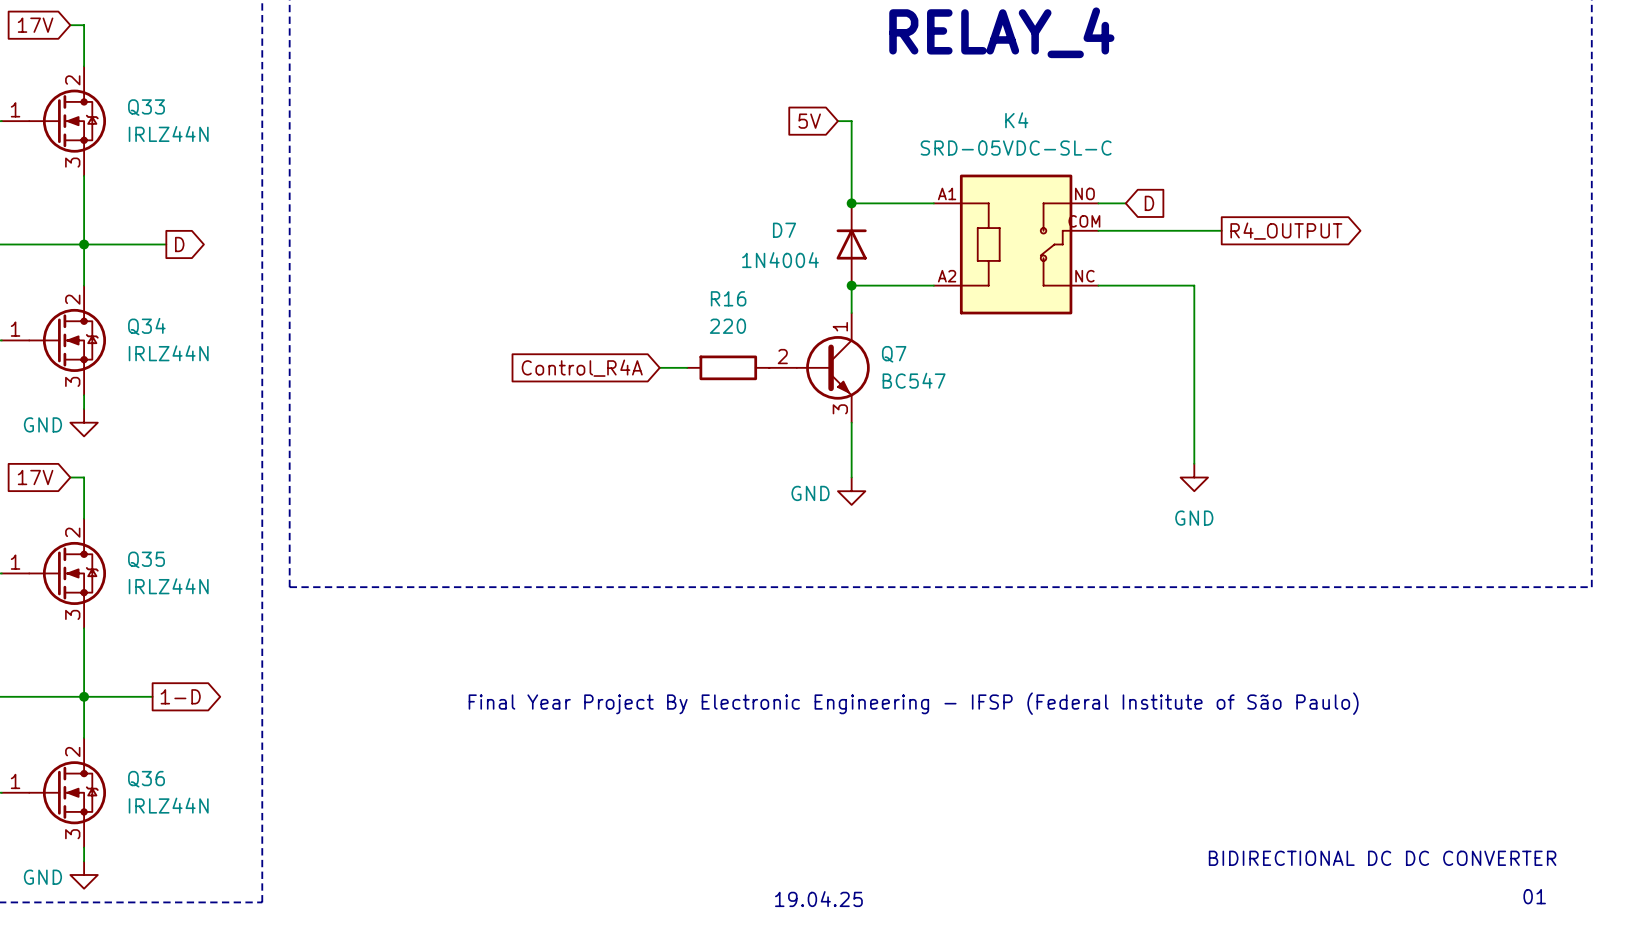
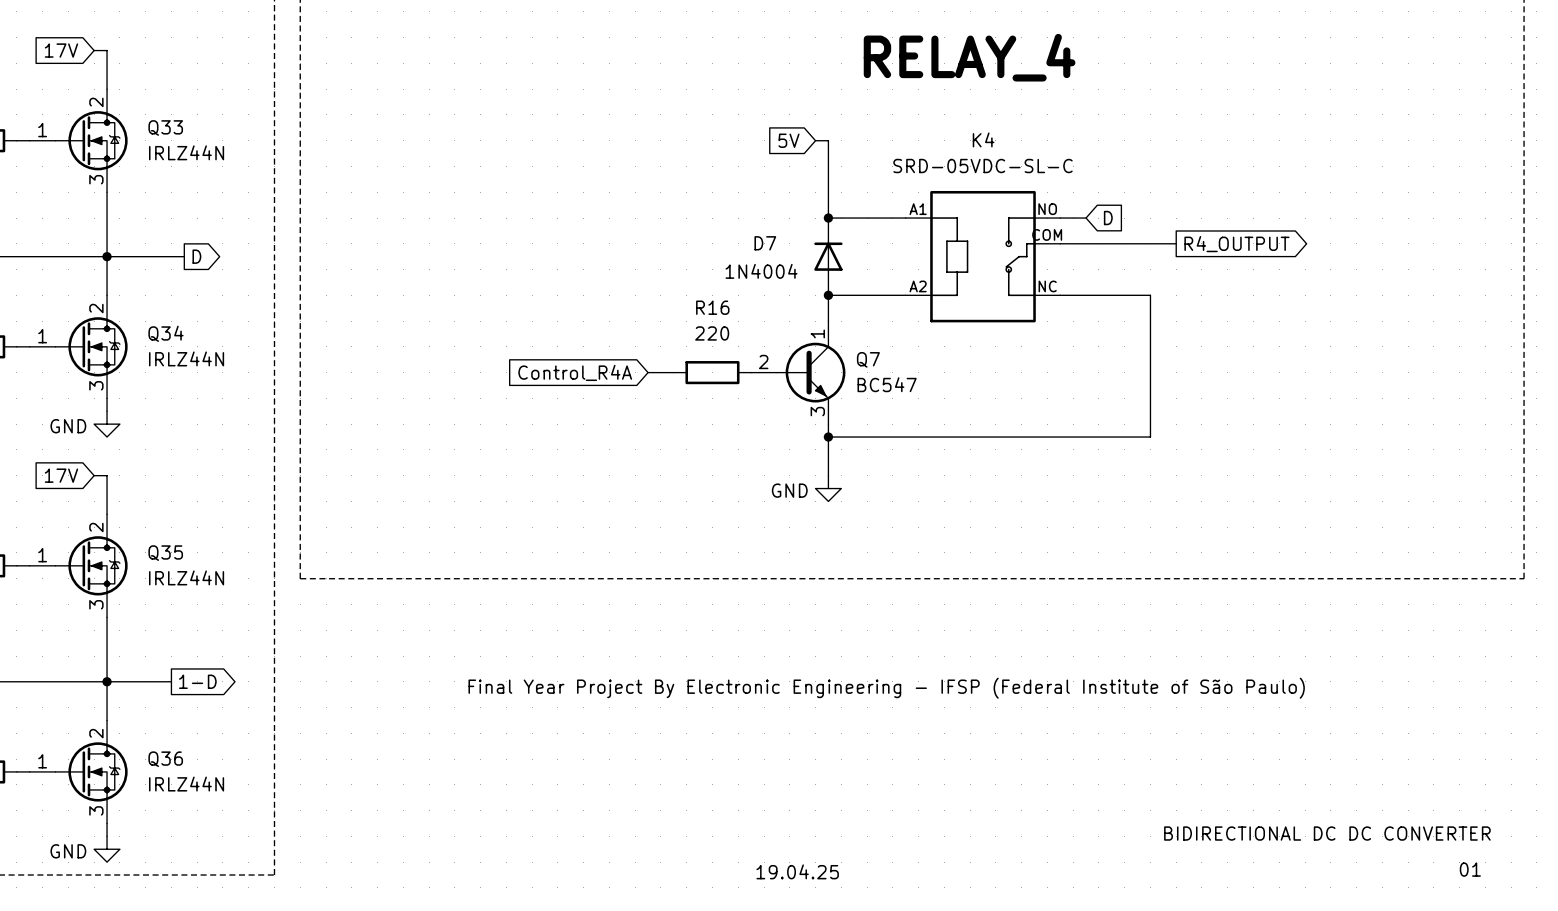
junction: none -> (828, 437)
wire: (1194, 436) (1194, 463) -> (1150, 437) (828, 437)
power symbol: GND (1194, 477) -> none

